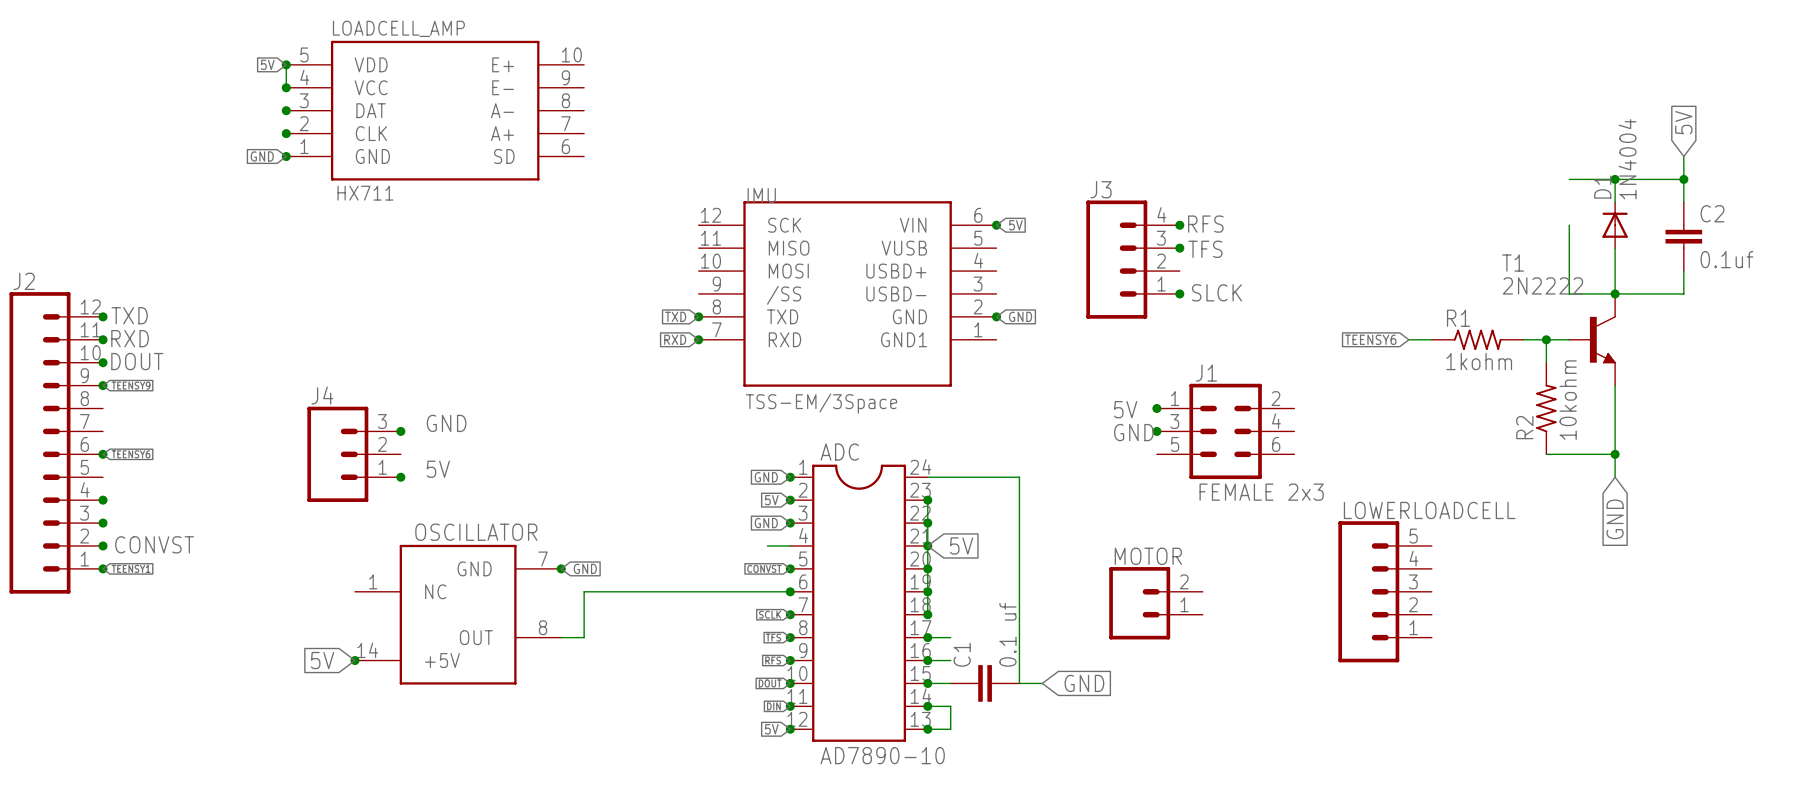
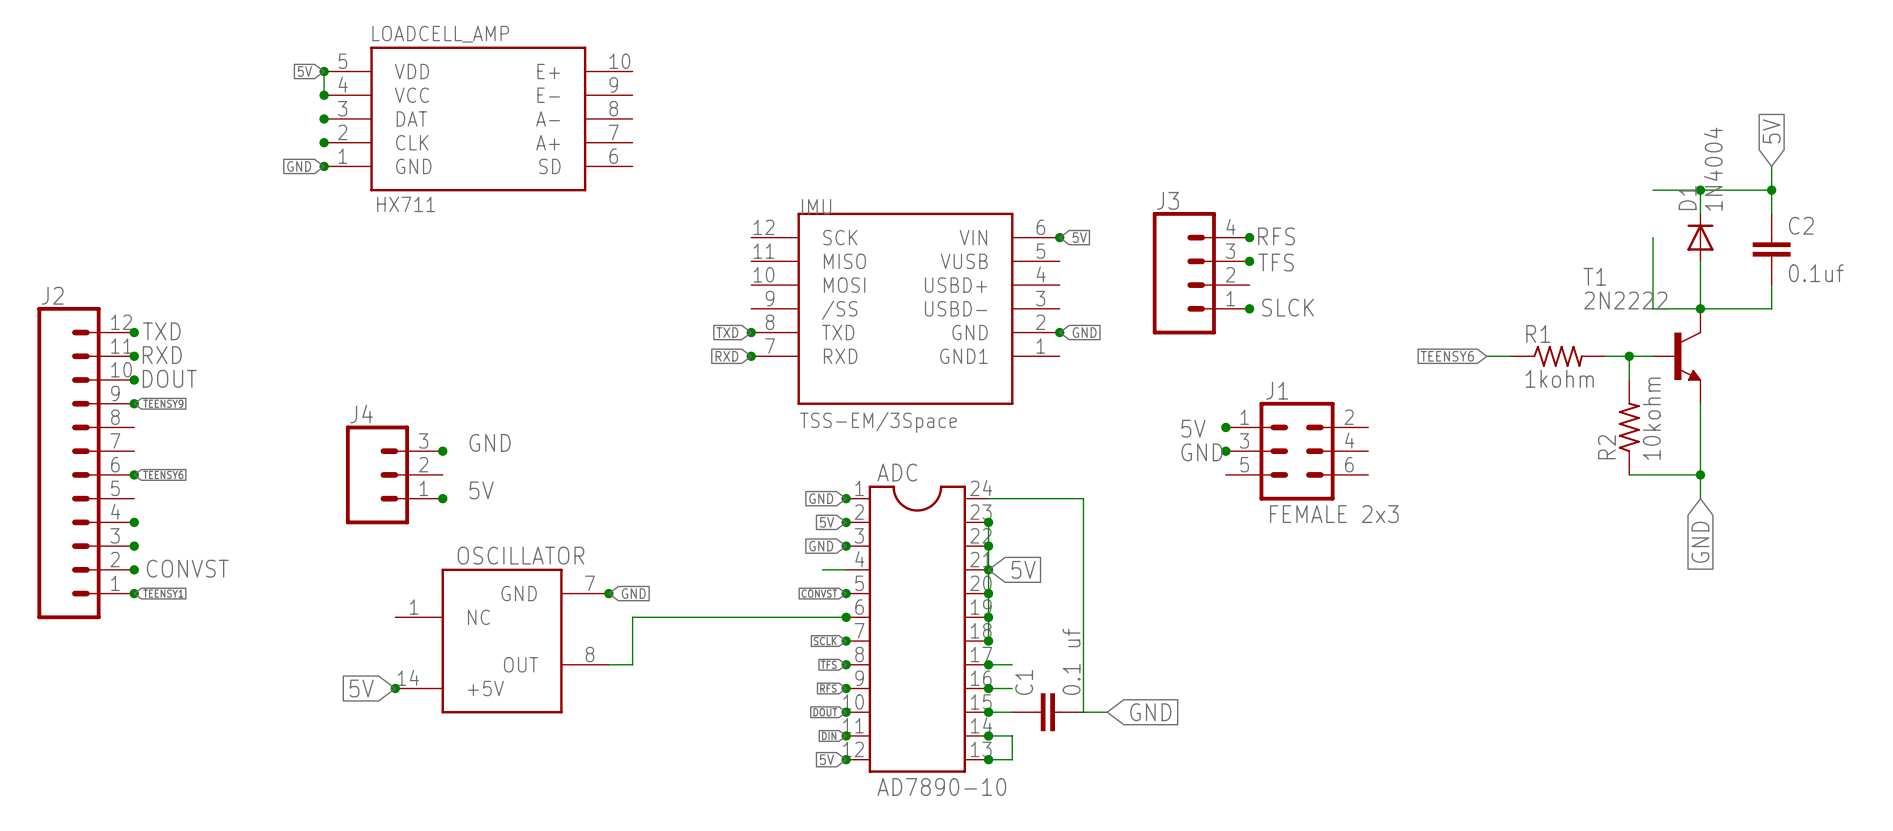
LOWERLOADCELL: (1385, 591) -> none
MOTOR: (1155, 603) -> none

